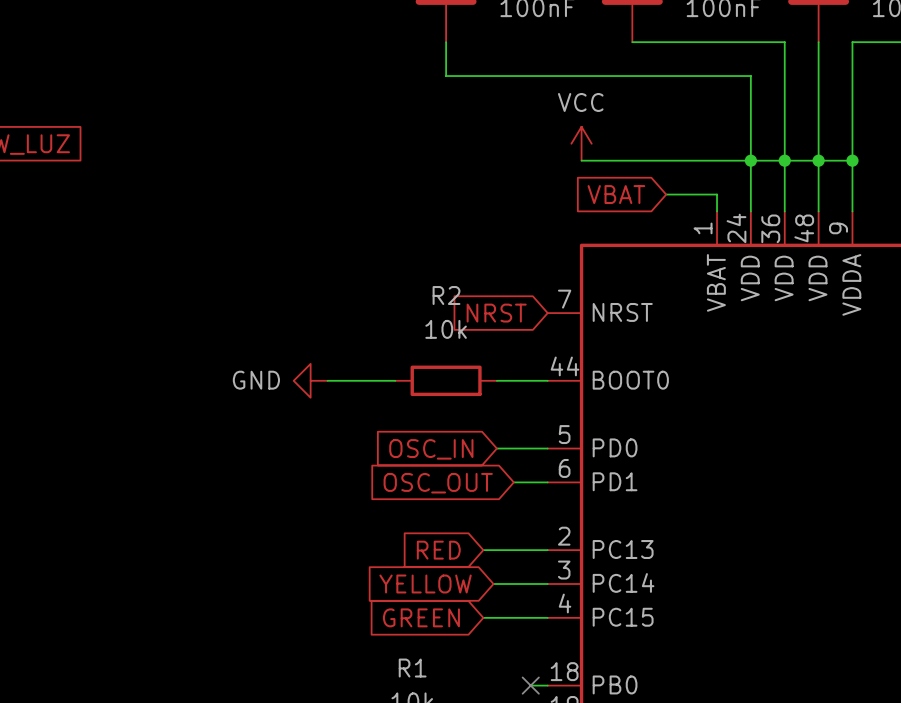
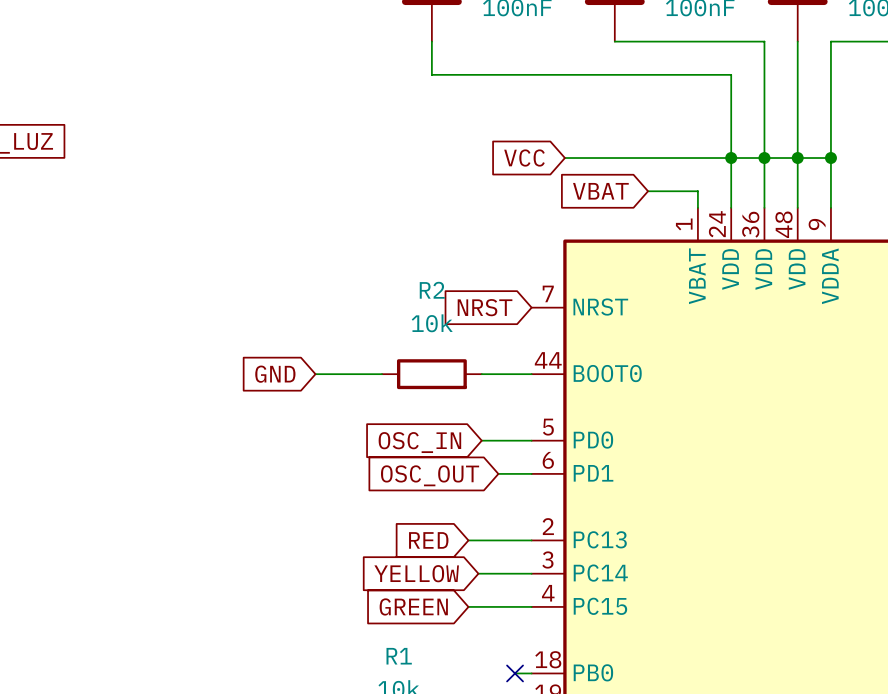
power symbol: VCC (581, 143) -> none
global label: none -> VCC (524, 158)
global label: none -> GND (275, 374)
power symbol: GND (310, 380) -> none

